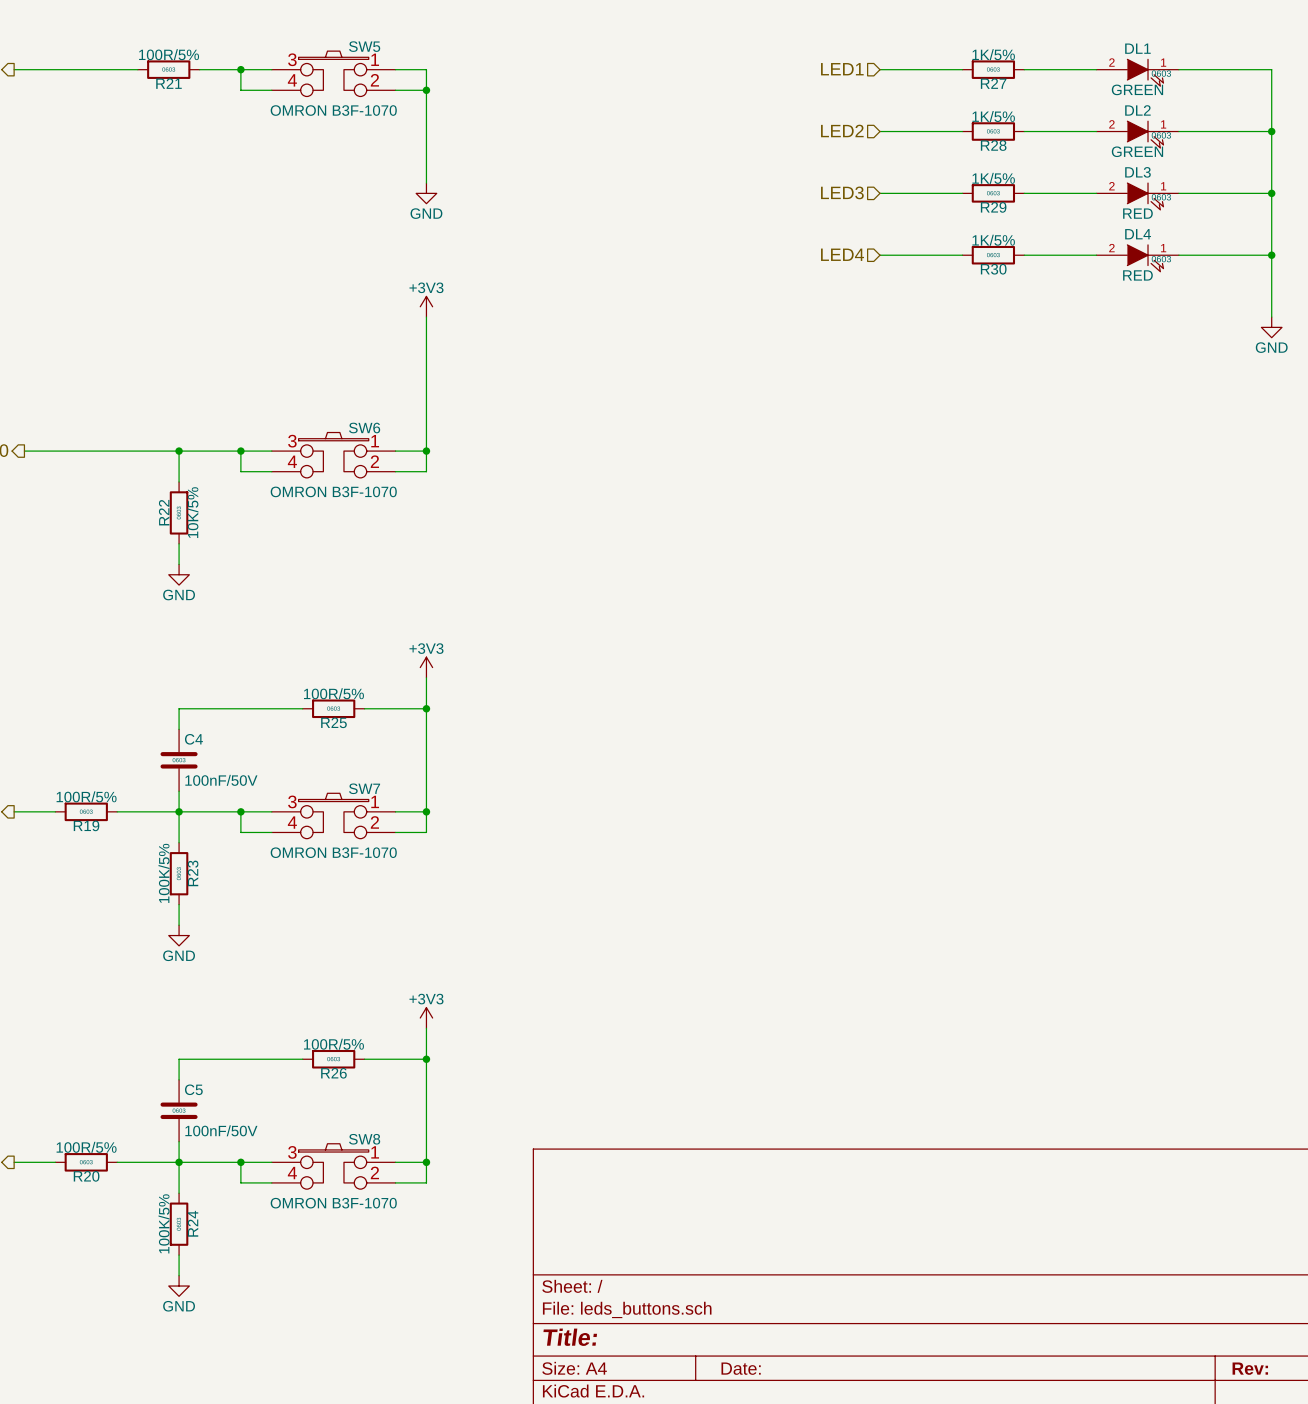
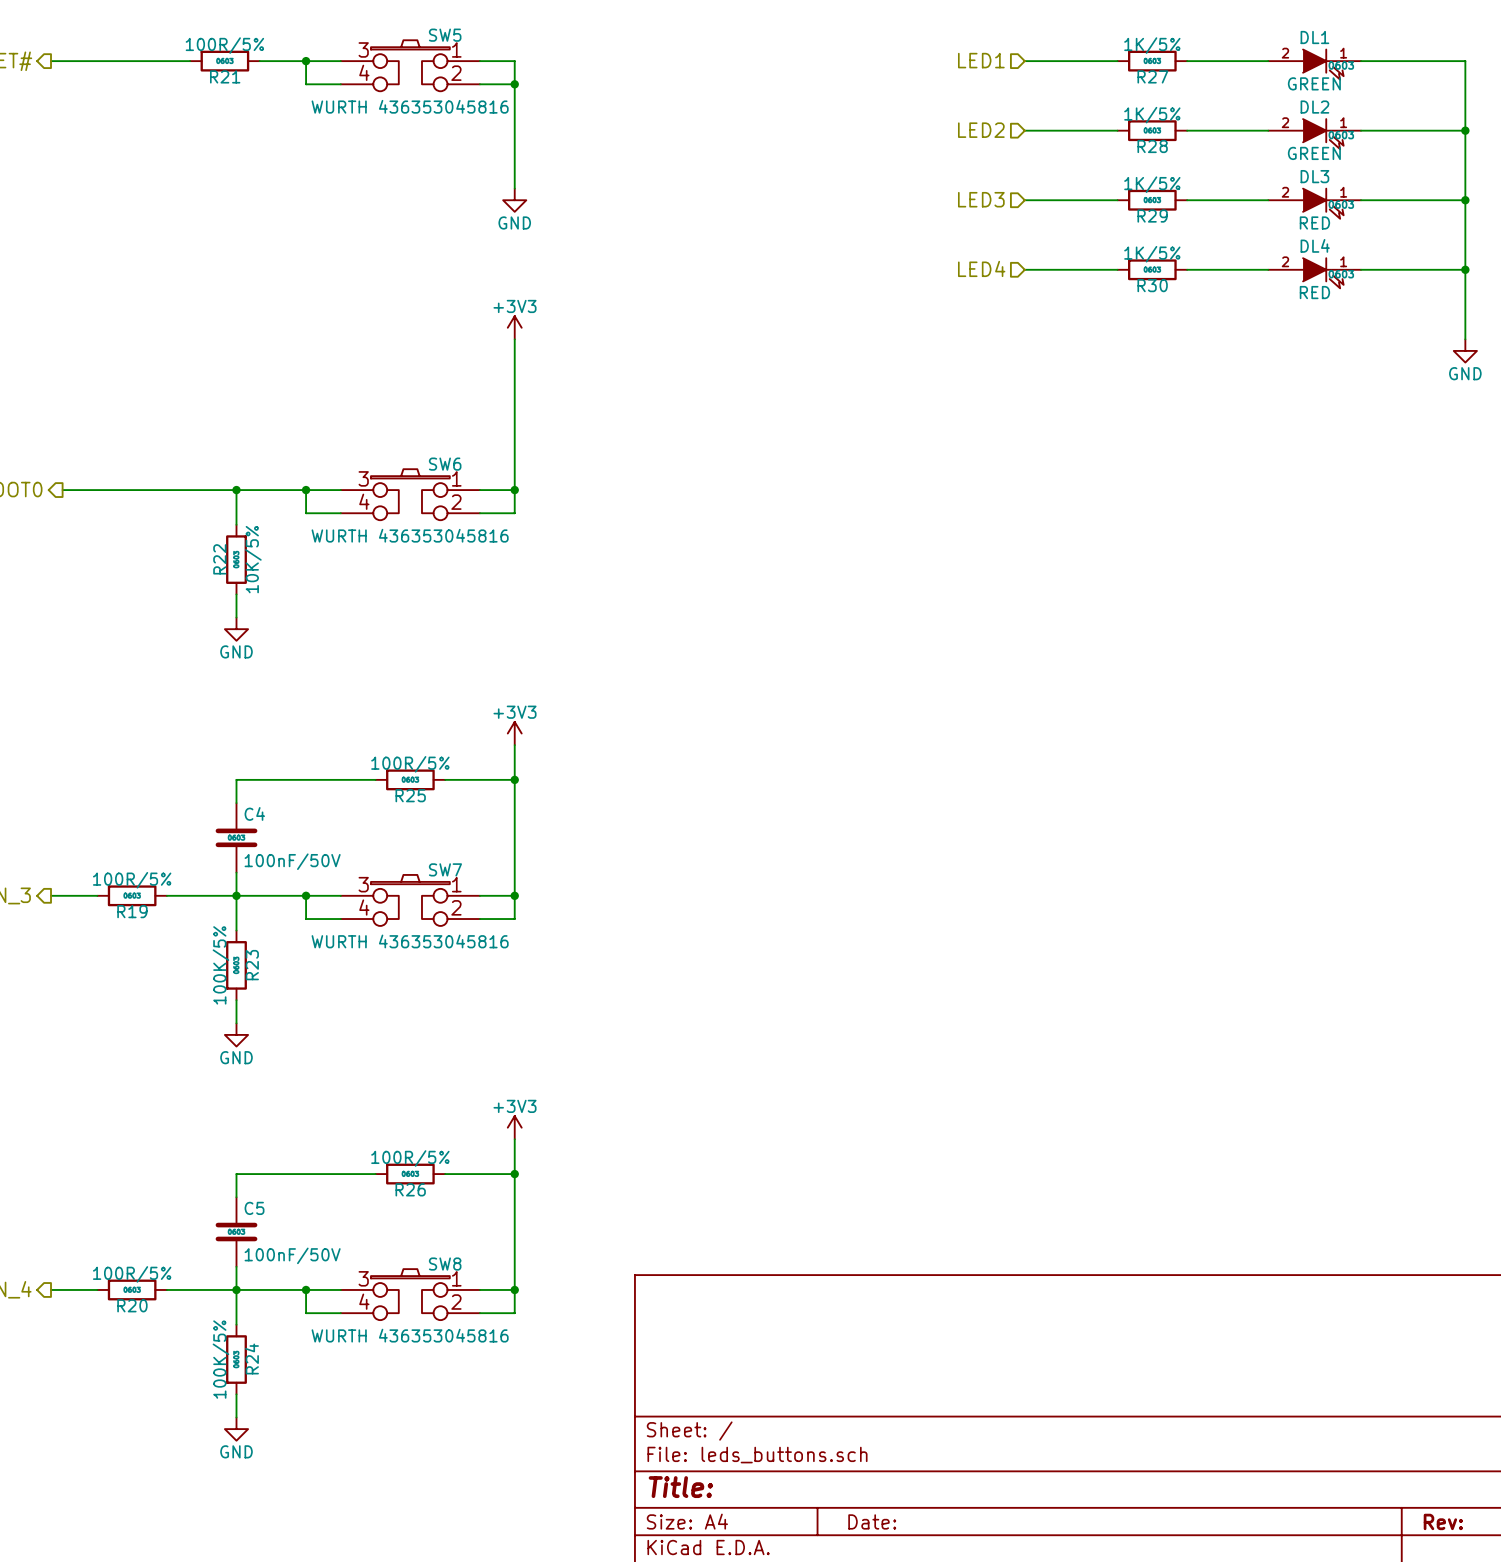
SW5 value: OMRON B3F-1070 (333, 110) -> WURTH 436353045816 (410, 106)
SW6 value: OMRON B3F-1070 (333, 491) -> WURTH 436353045816 (410, 535)
SW7 value: OMRON B3F-1070 (333, 852) -> WURTH 436353045816 (410, 941)
SW8 value: OMRON B3F-1070 (333, 1203) -> WURTH 436353045816 (410, 1335)

